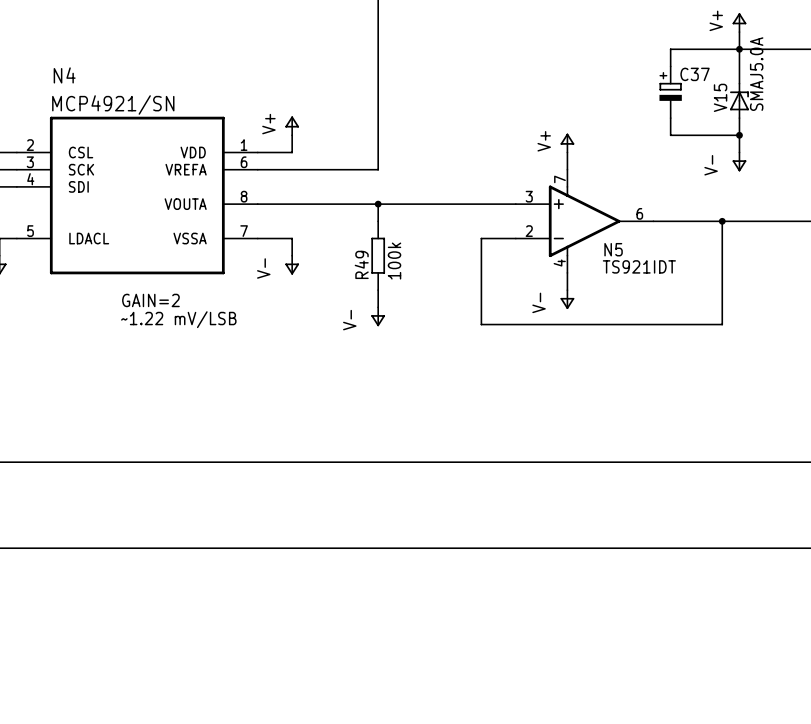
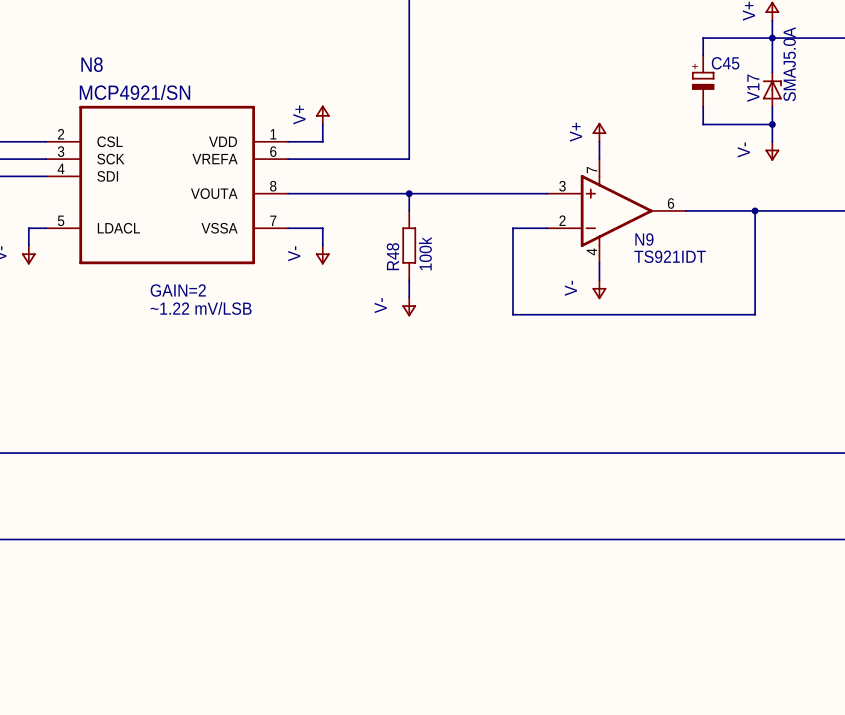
C37 name: C37 (695, 74) -> C45 (725, 63)
N4 name: N4 (64, 75) -> N8 (92, 64)
V15 name: V15 (720, 97) -> V17 (753, 88)
N5 name: N5 (613, 249) -> N9 (644, 239)
R49 name: R49 (361, 264) -> R48 (392, 256)

